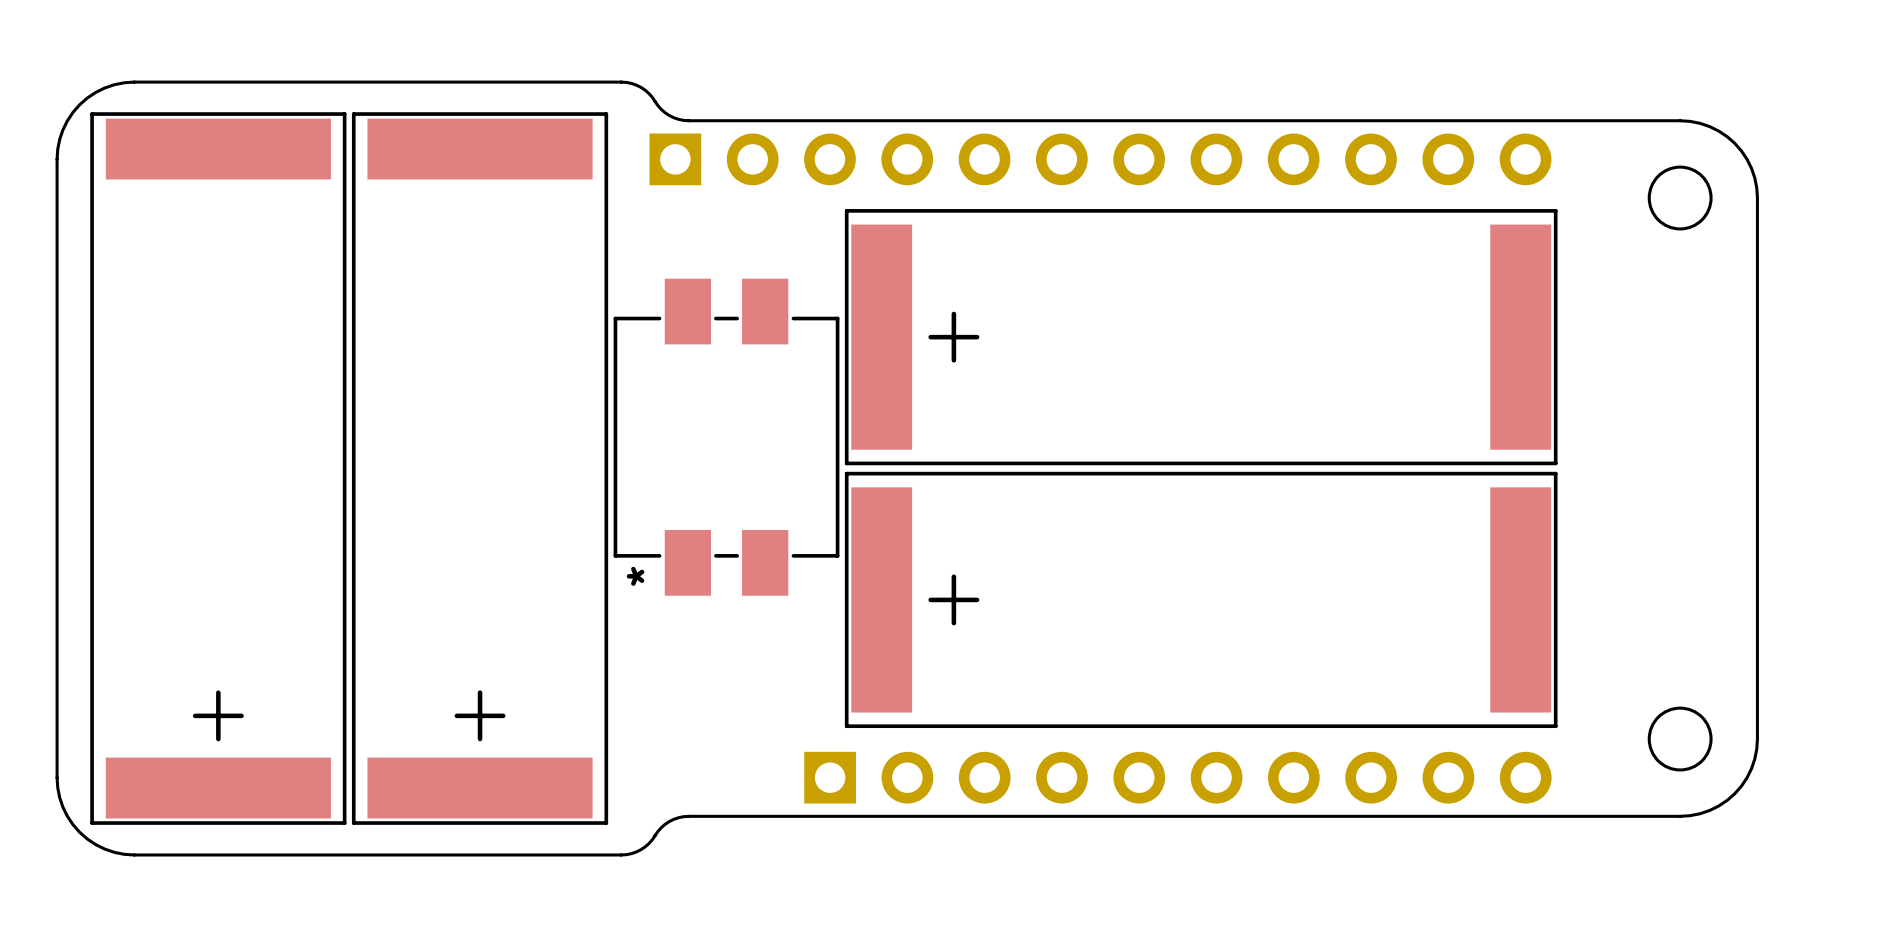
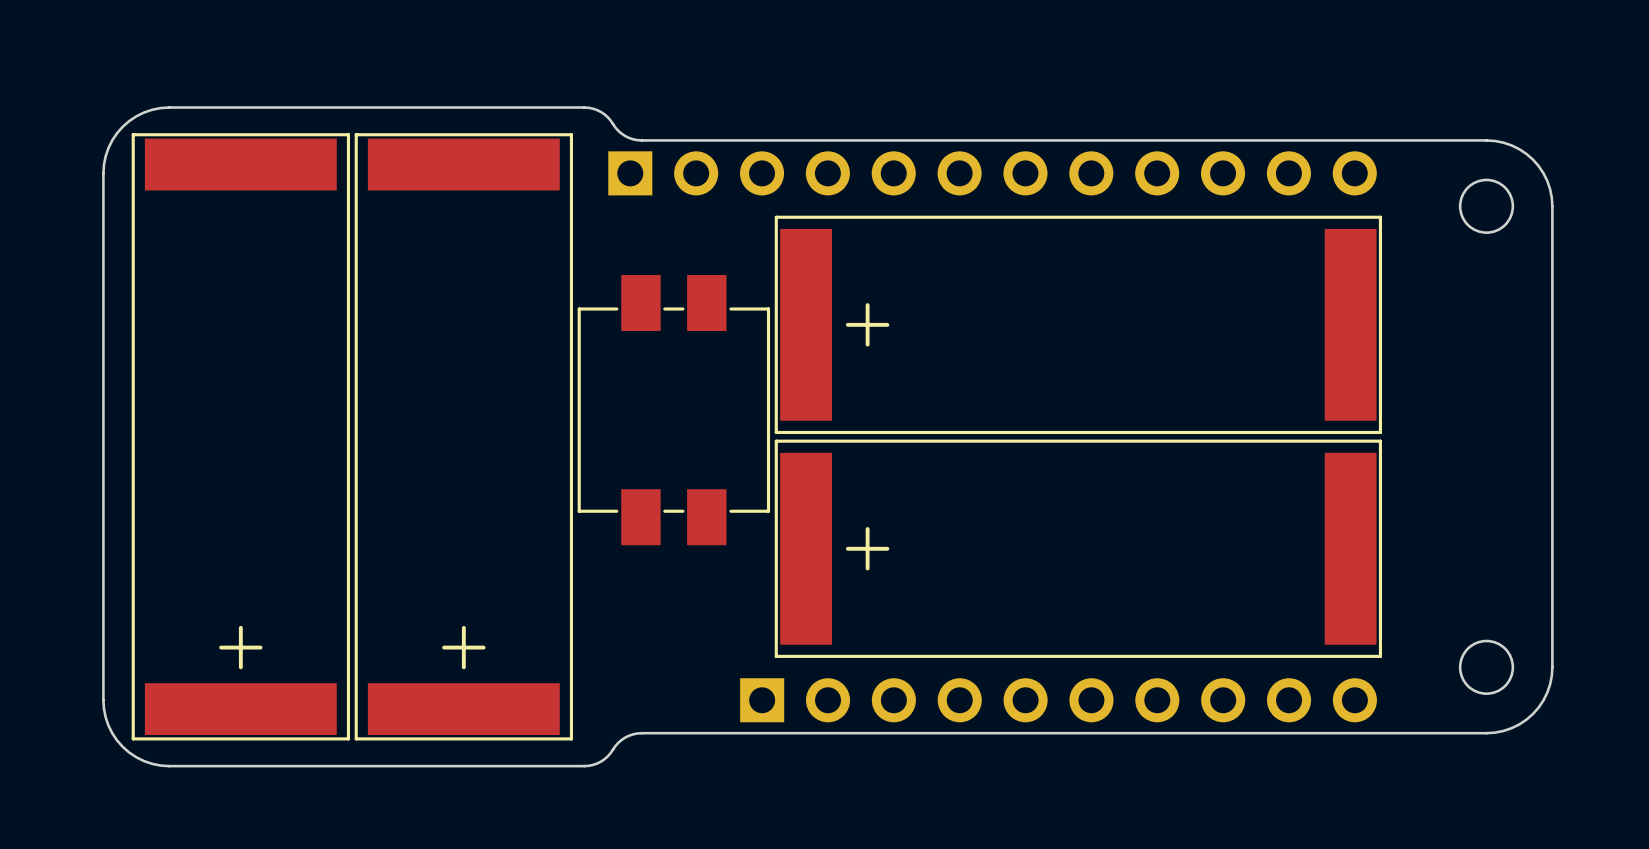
part text: * (635, 576) -> none

